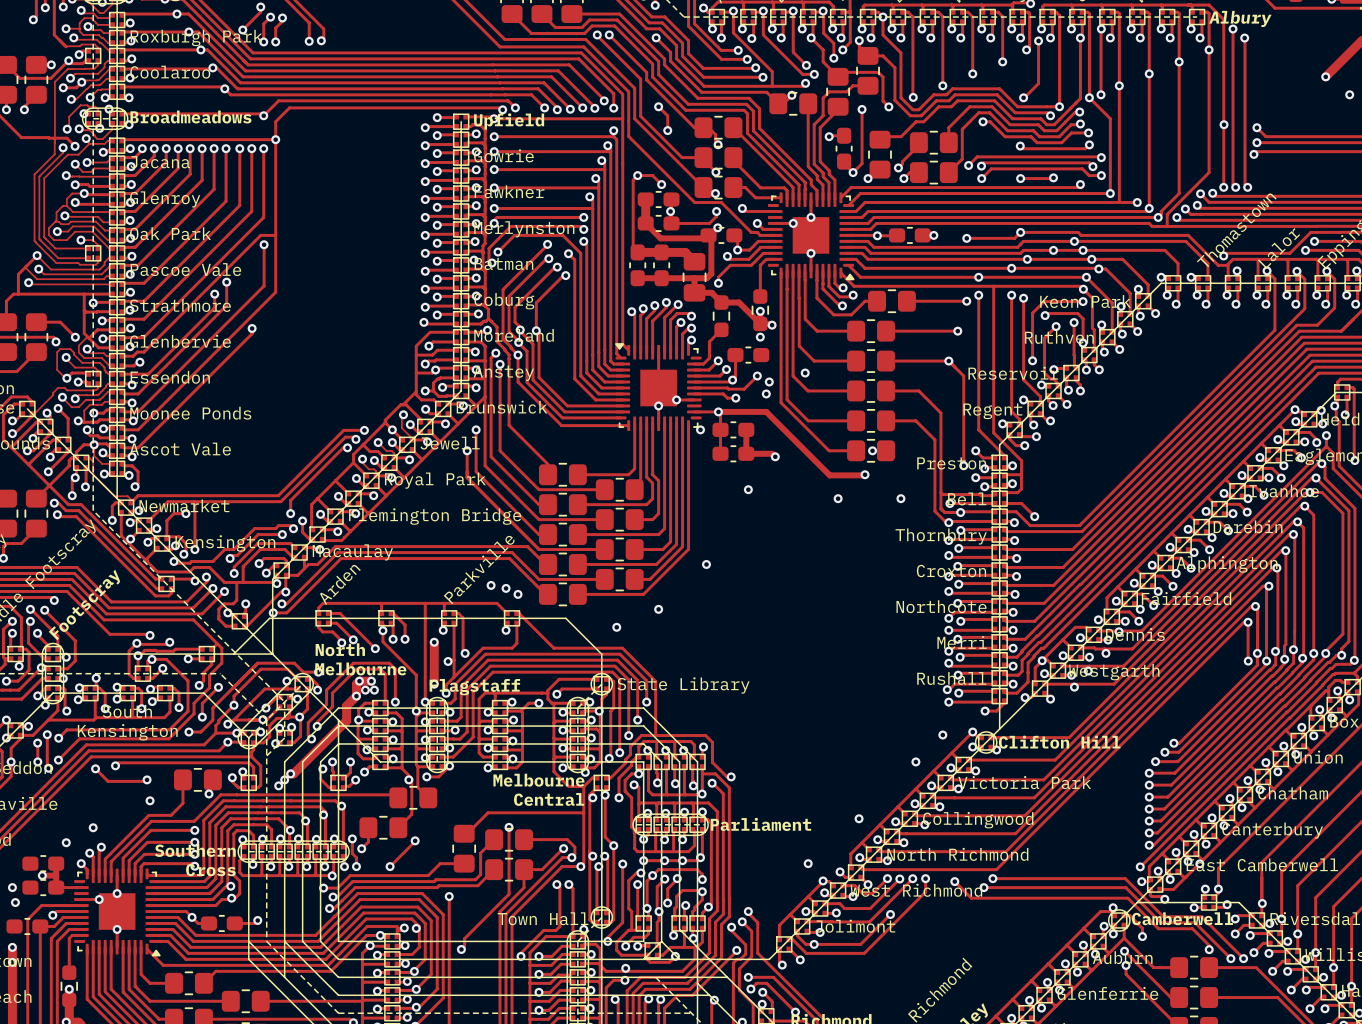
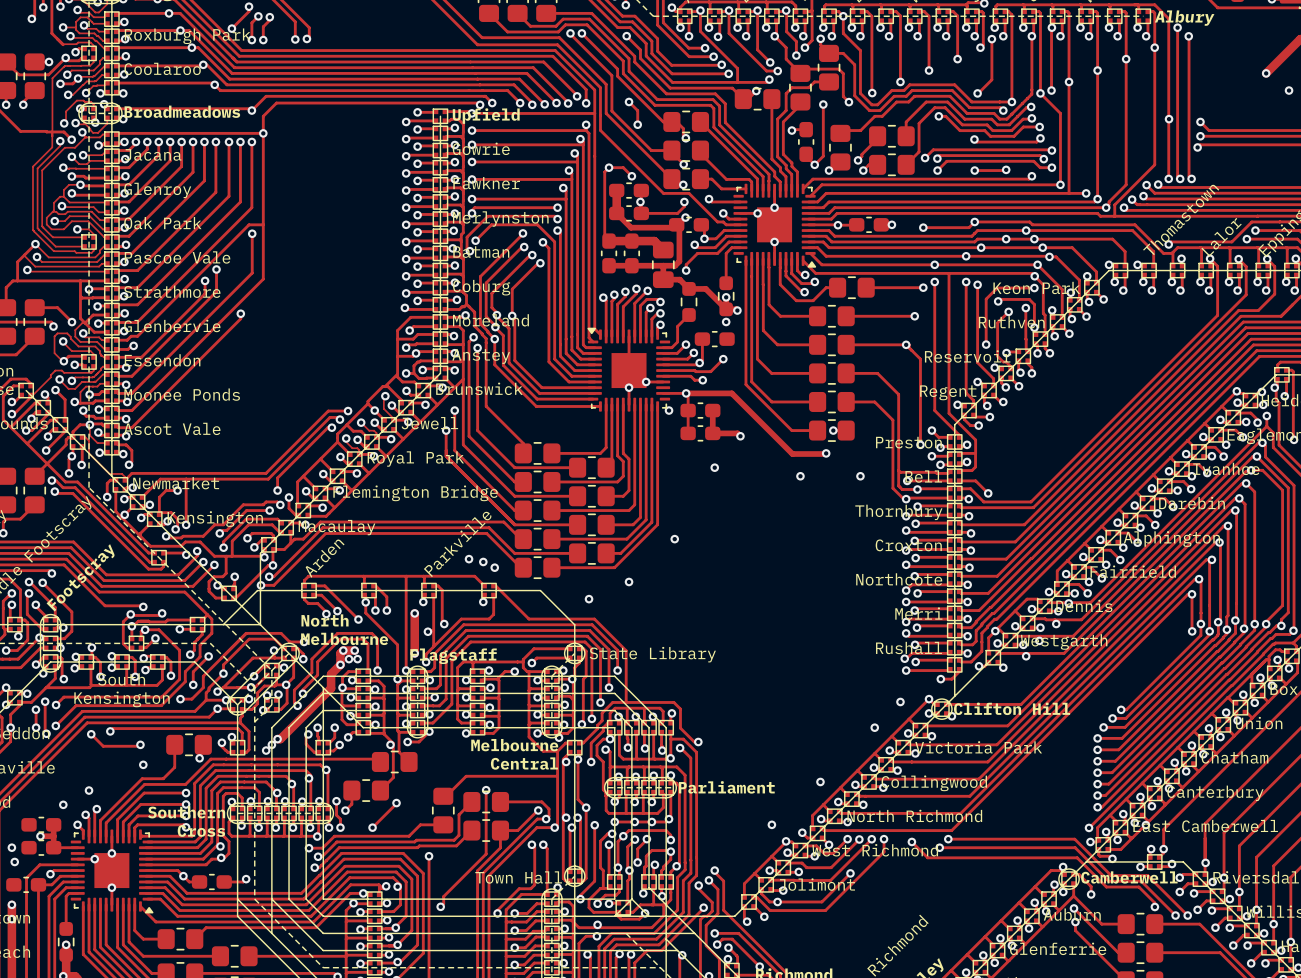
via: (805, 373) -> none
via: (769, 382) -> none
via: (766, 393) -> none

